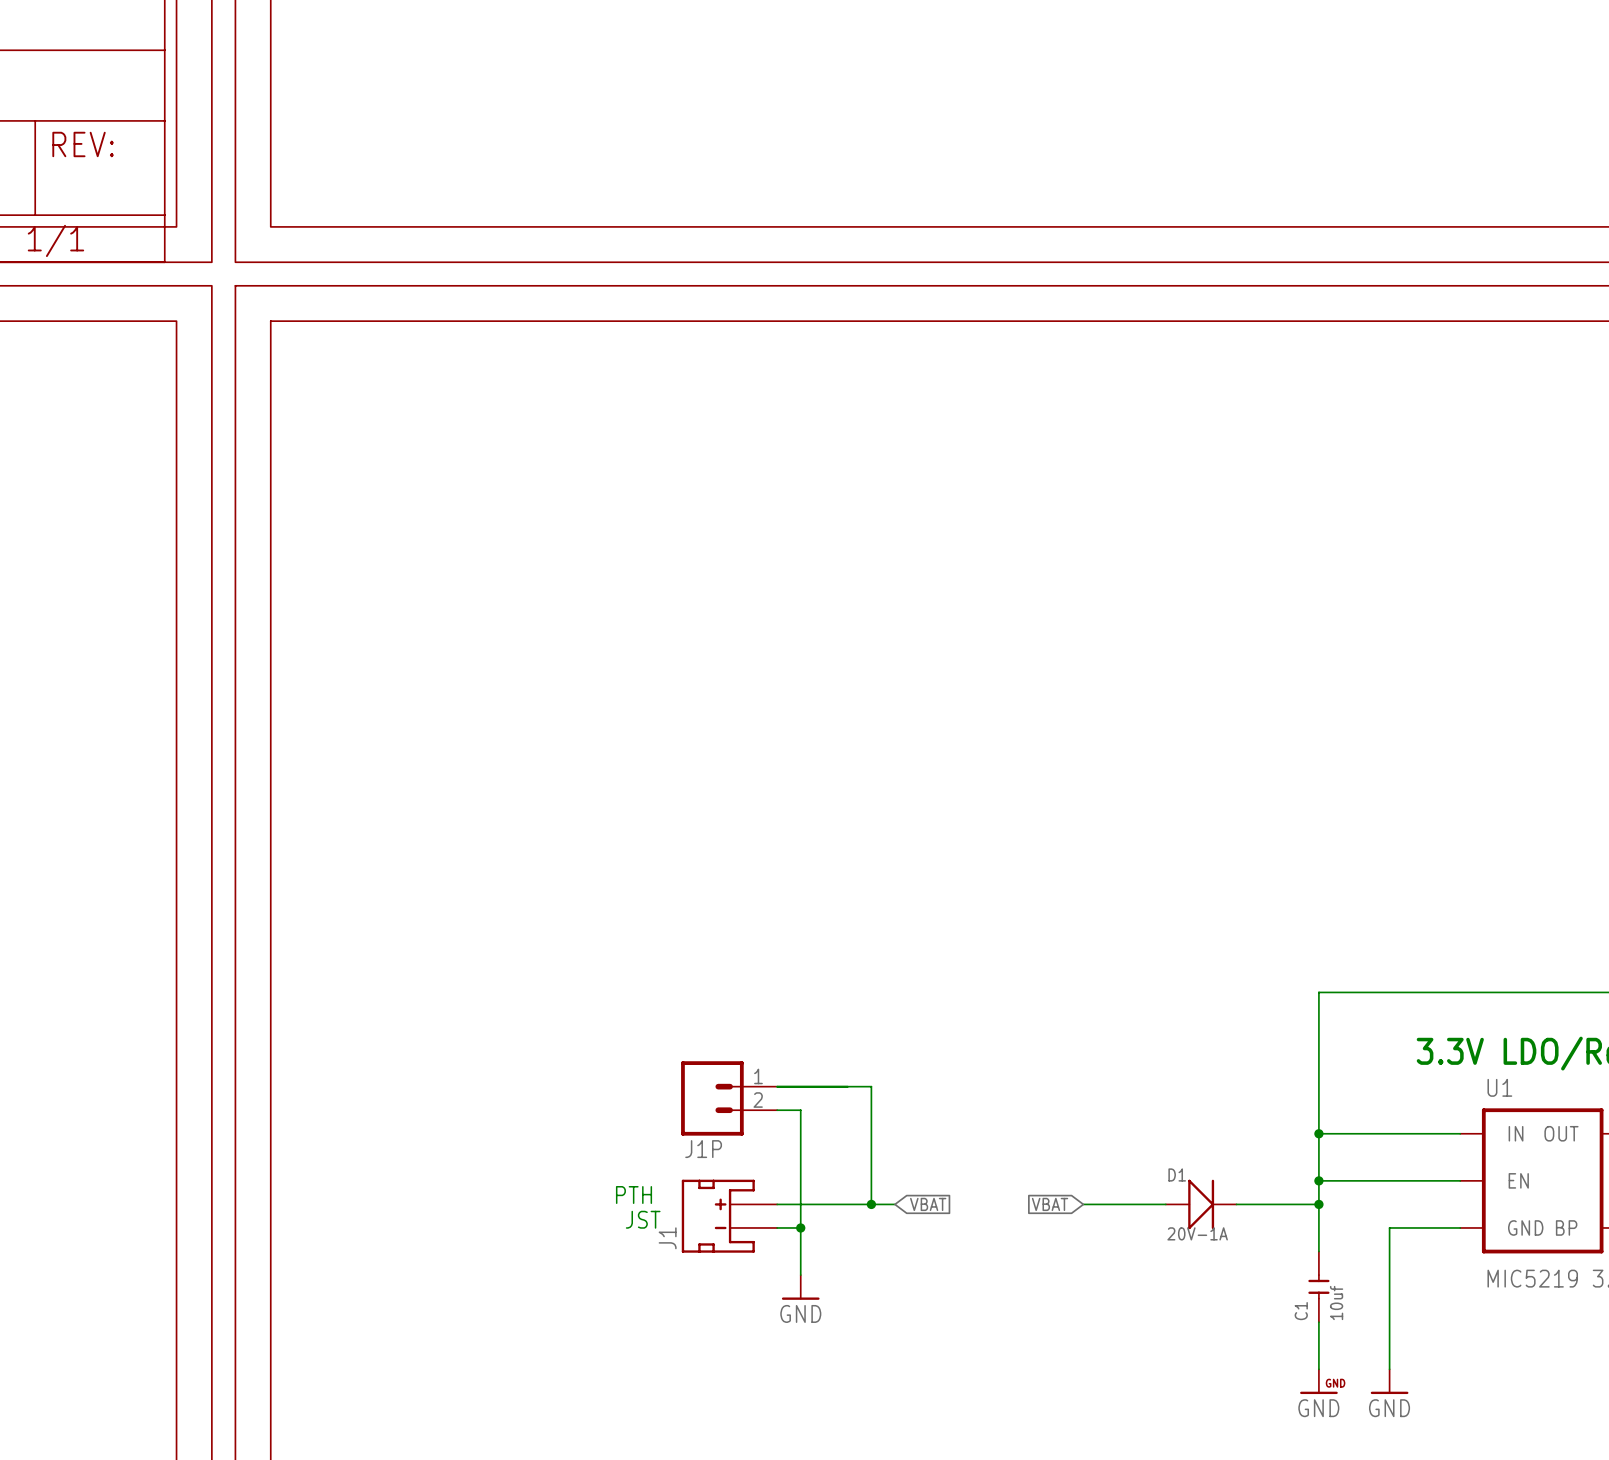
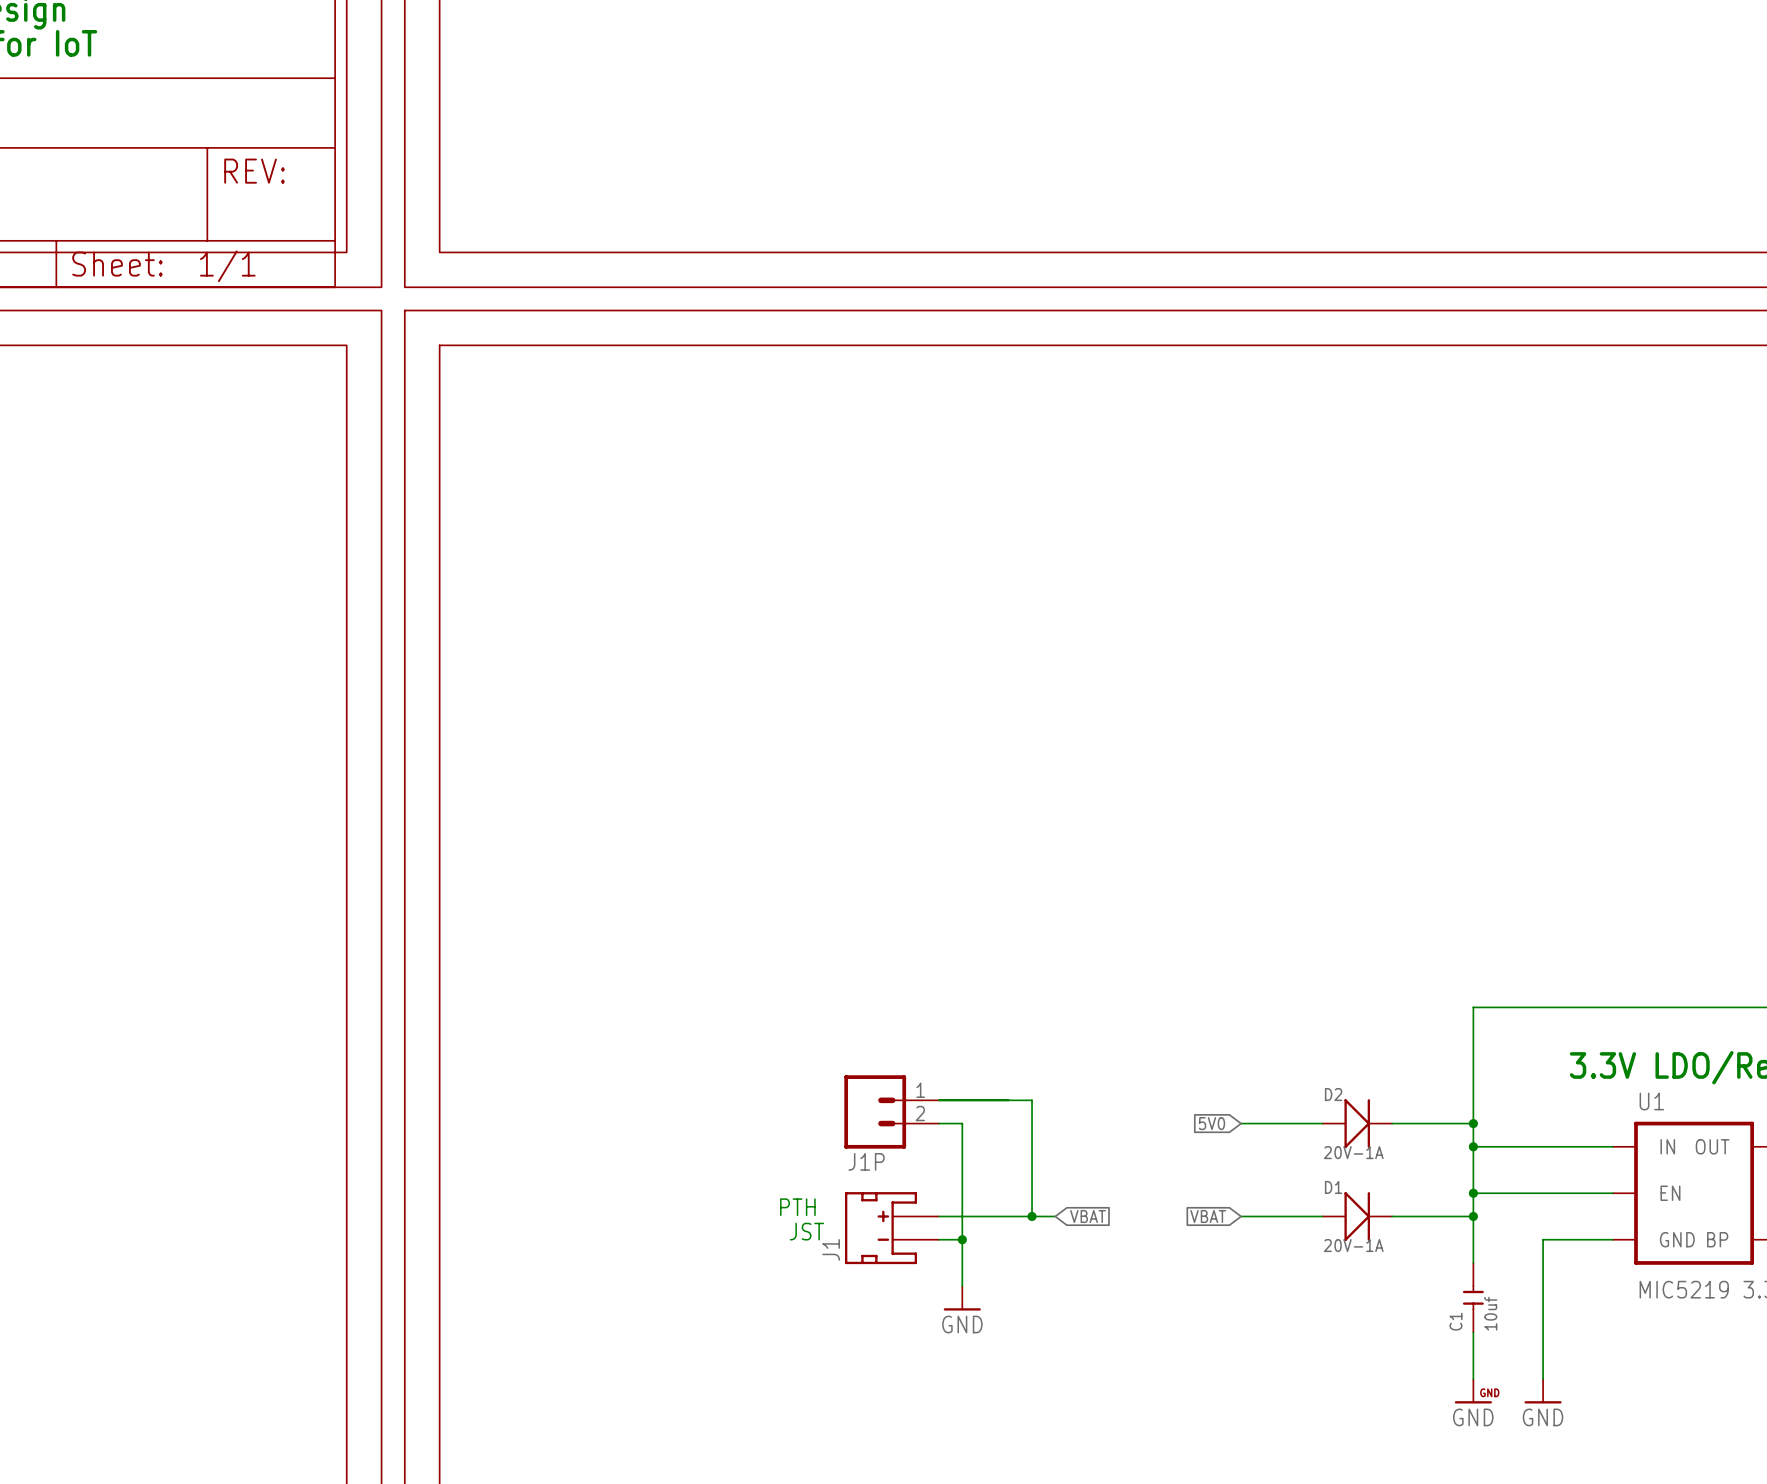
global label: none -> 5V0 (1211, 1123)
wire: none -> (1241, 1123) (1322, 1123)
D2: none -> 20V-1A (1357, 1123)
wire: none -> (1392, 1123) (1473, 1123)
junction: none -> (1473, 1123)

